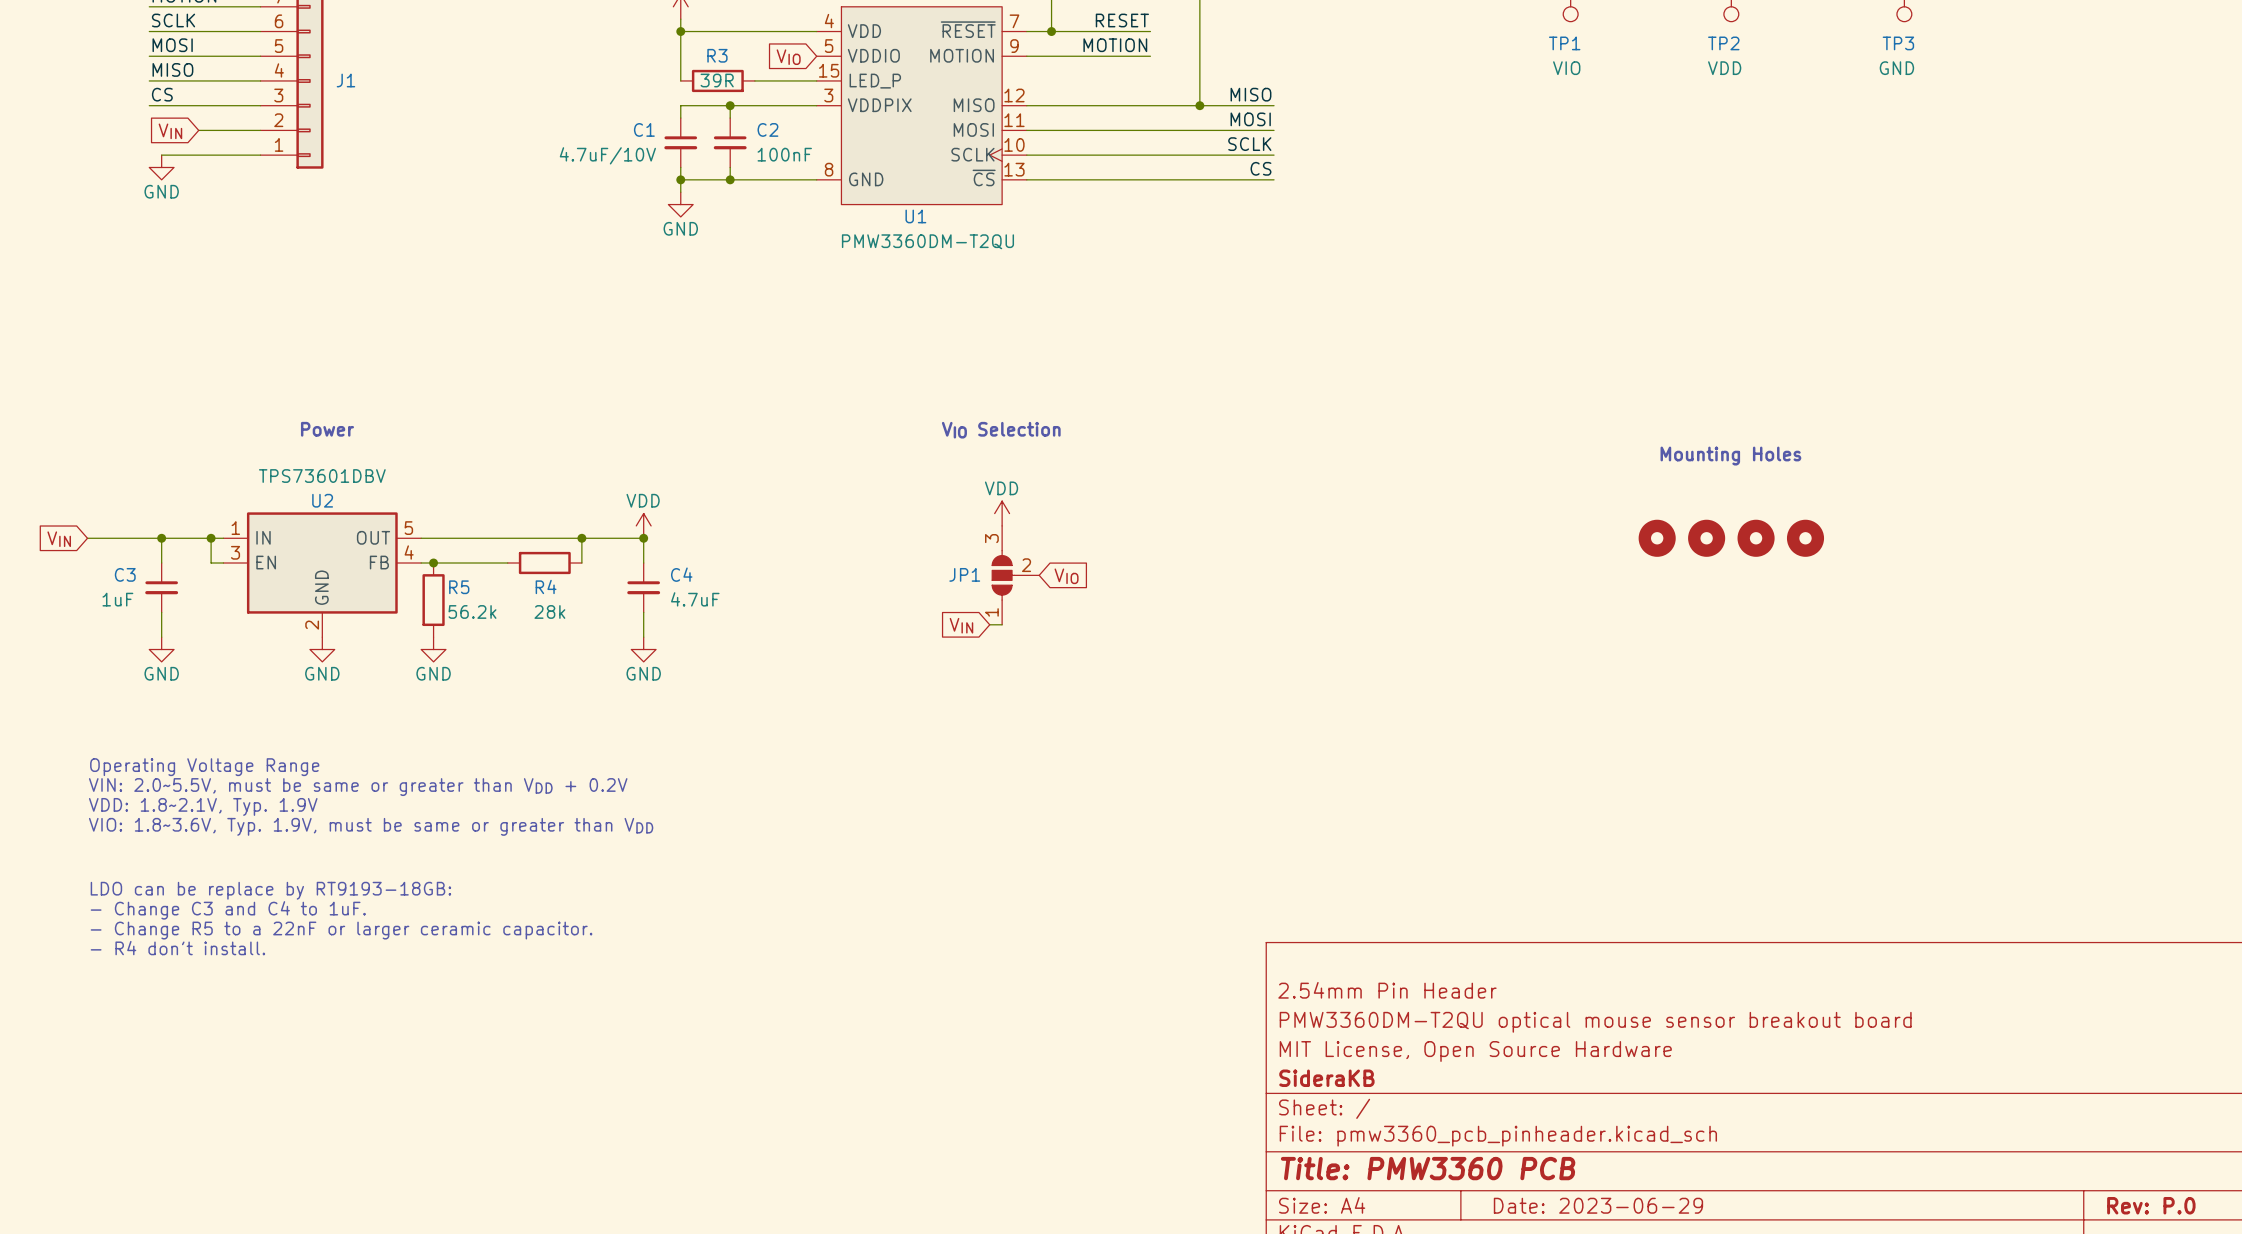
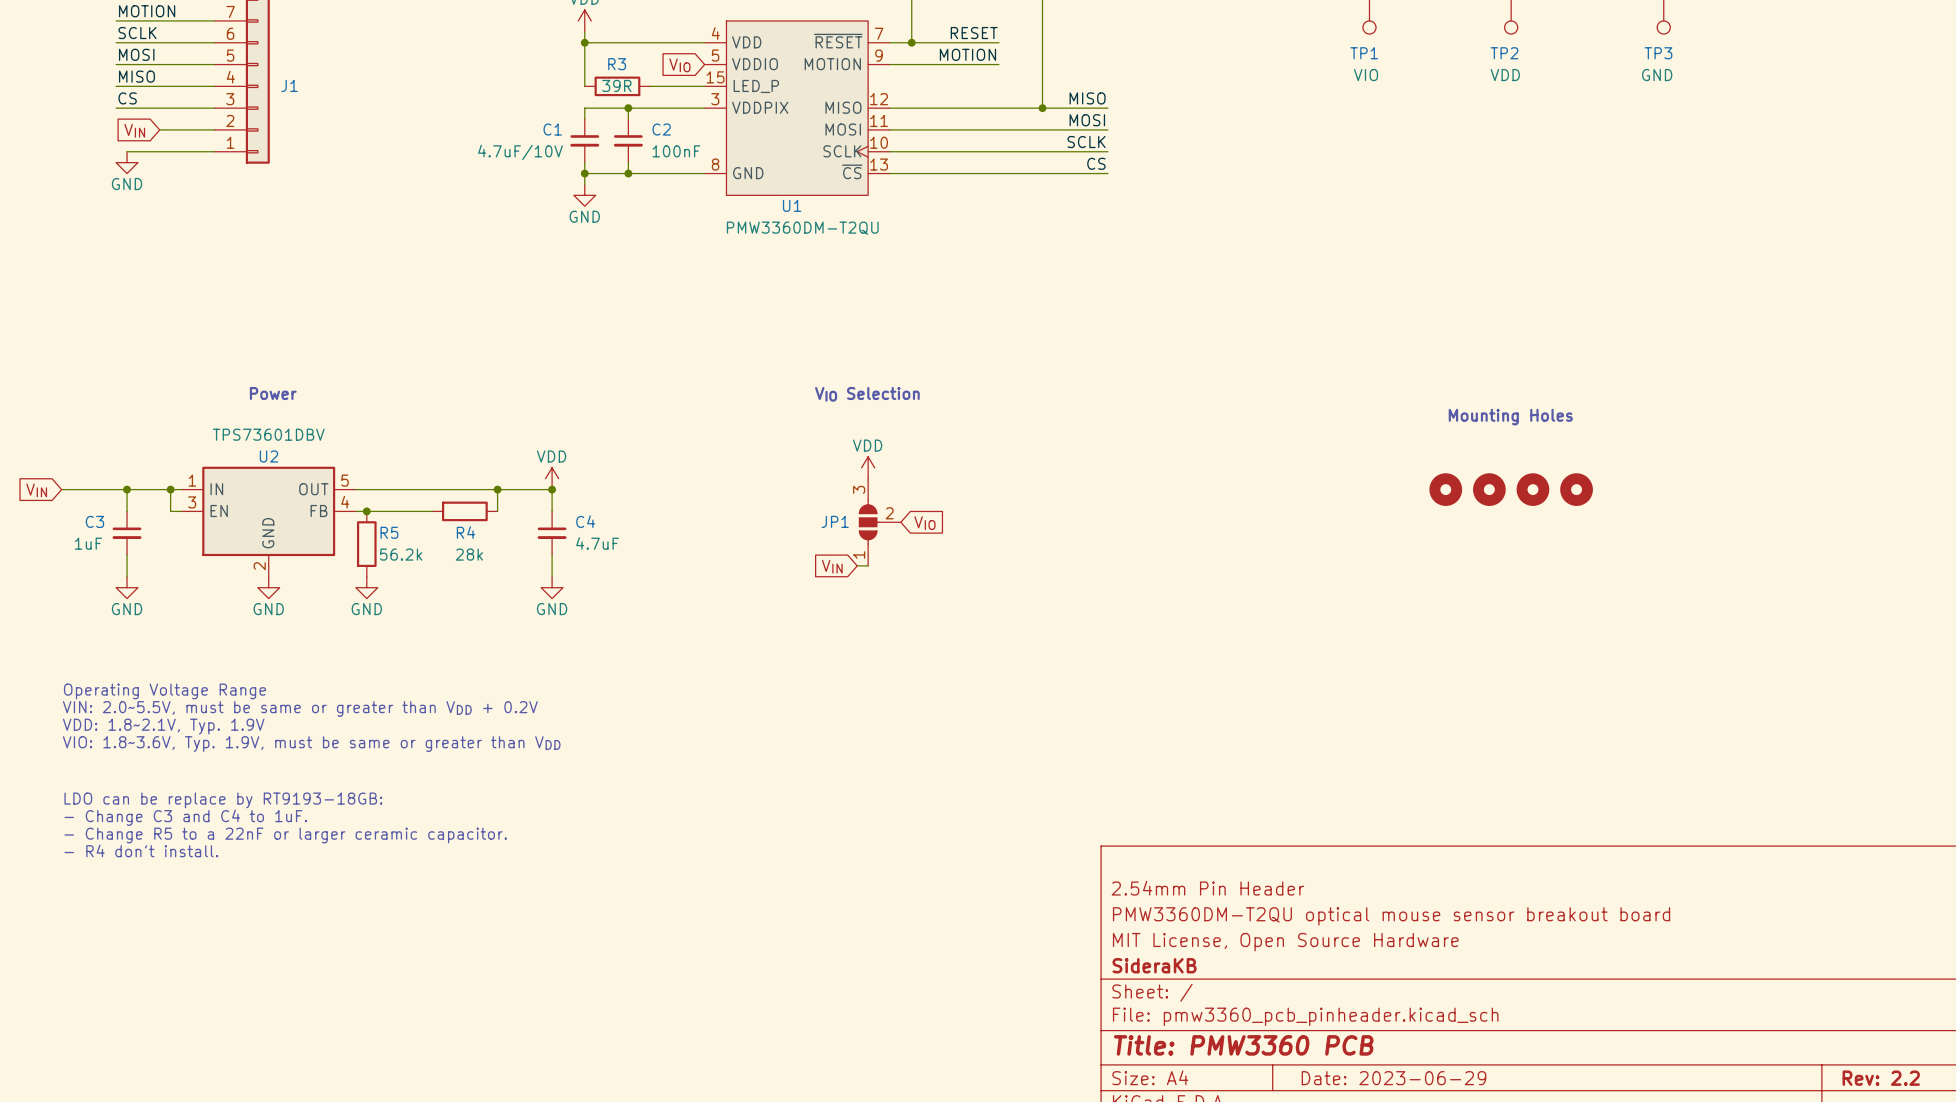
title block: Rev: P.0 (2151, 1205) -> Rev: 2.2 (1881, 1078)

